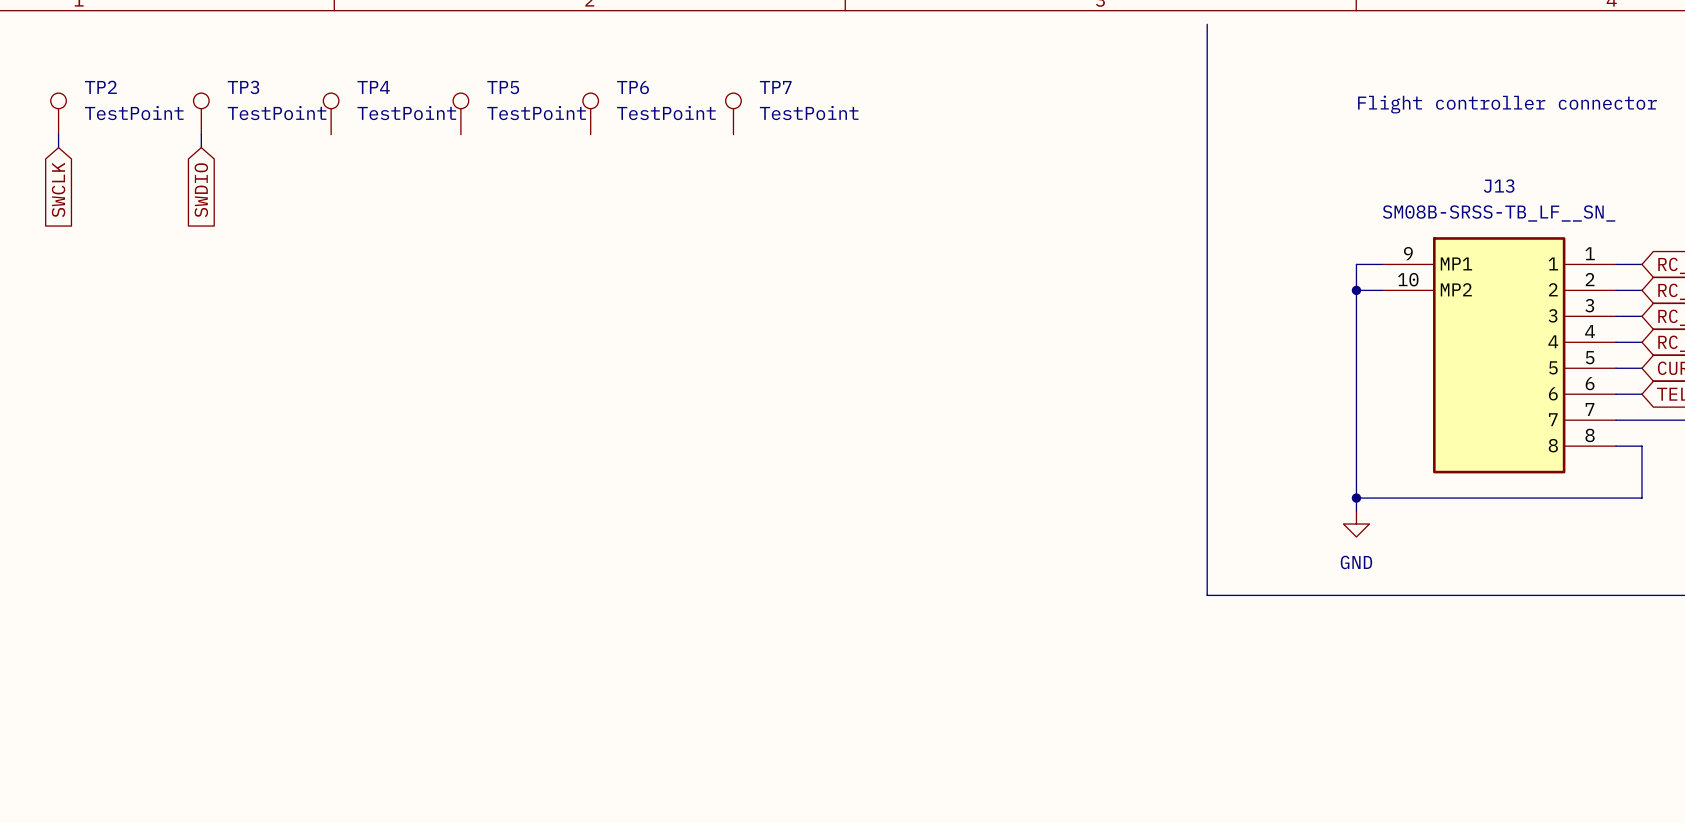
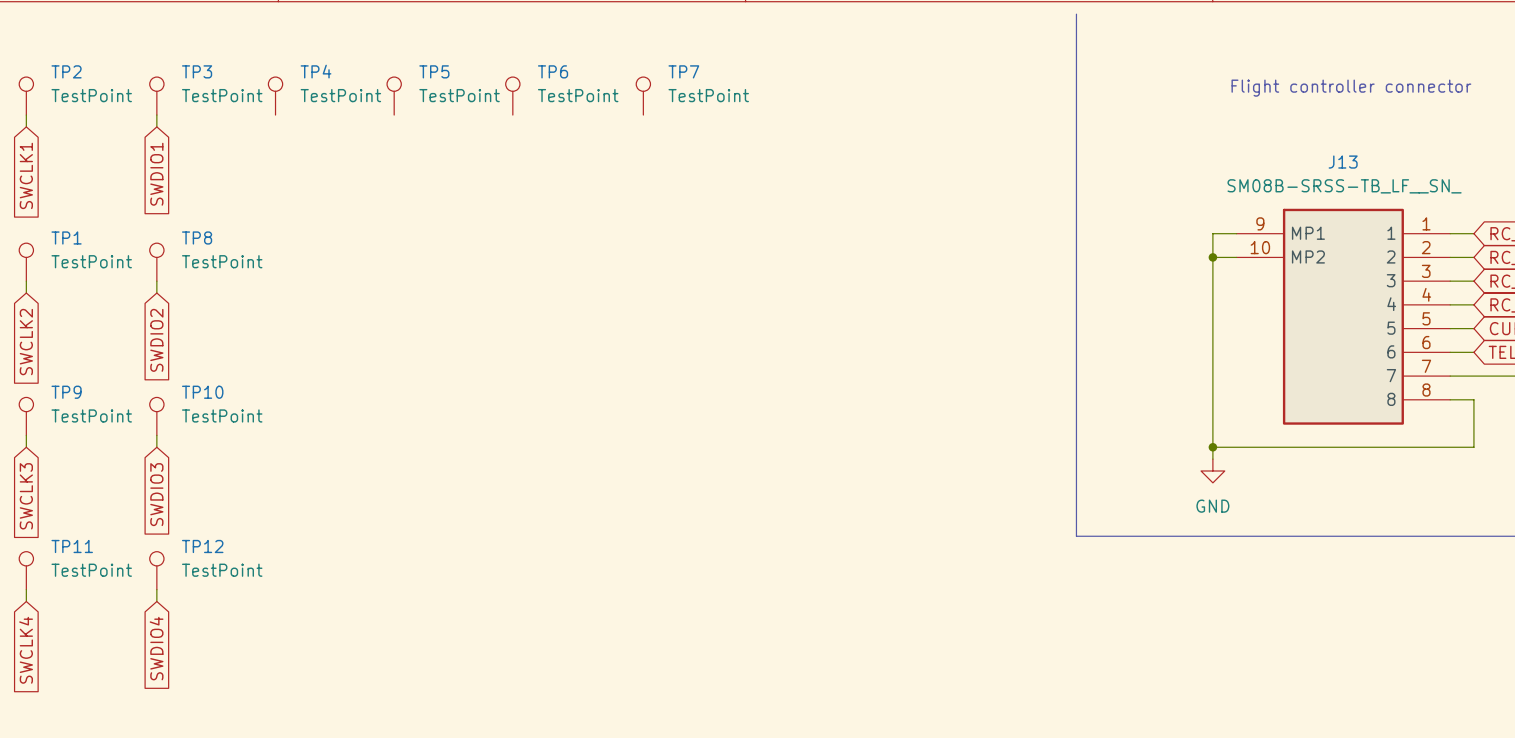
global label: SWCLK (58, 189) -> SWCLK1 (26, 175)
global label: SWDIO (201, 190) -> SWDIO1 (156, 174)
TP1: none -> TestPoint (26, 262)
TP8: none -> TestPoint (156, 262)
wire: none -> (26, 281) (26, 293)
wire: none -> (156, 281) (156, 293)
global label: none -> SWCLK2 (26, 342)
global label: none -> SWDIO2 (156, 340)
TP9: none -> TestPoint (26, 416)
TP10: none -> TestPoint (156, 416)
wire: none -> (26, 435) (26, 447)
wire: none -> (156, 435) (156, 447)
global label: none -> SWCLK3 (26, 496)
global label: none -> SWDIO3 (156, 494)
TP11: none -> TestPoint (26, 570)
TP12: none -> TestPoint (156, 570)
wire: none -> (26, 589) (26, 601)
wire: none -> (156, 589) (156, 601)
global label: none -> SWCLK4 (26, 650)
global label: none -> SWDIO4 (156, 648)

